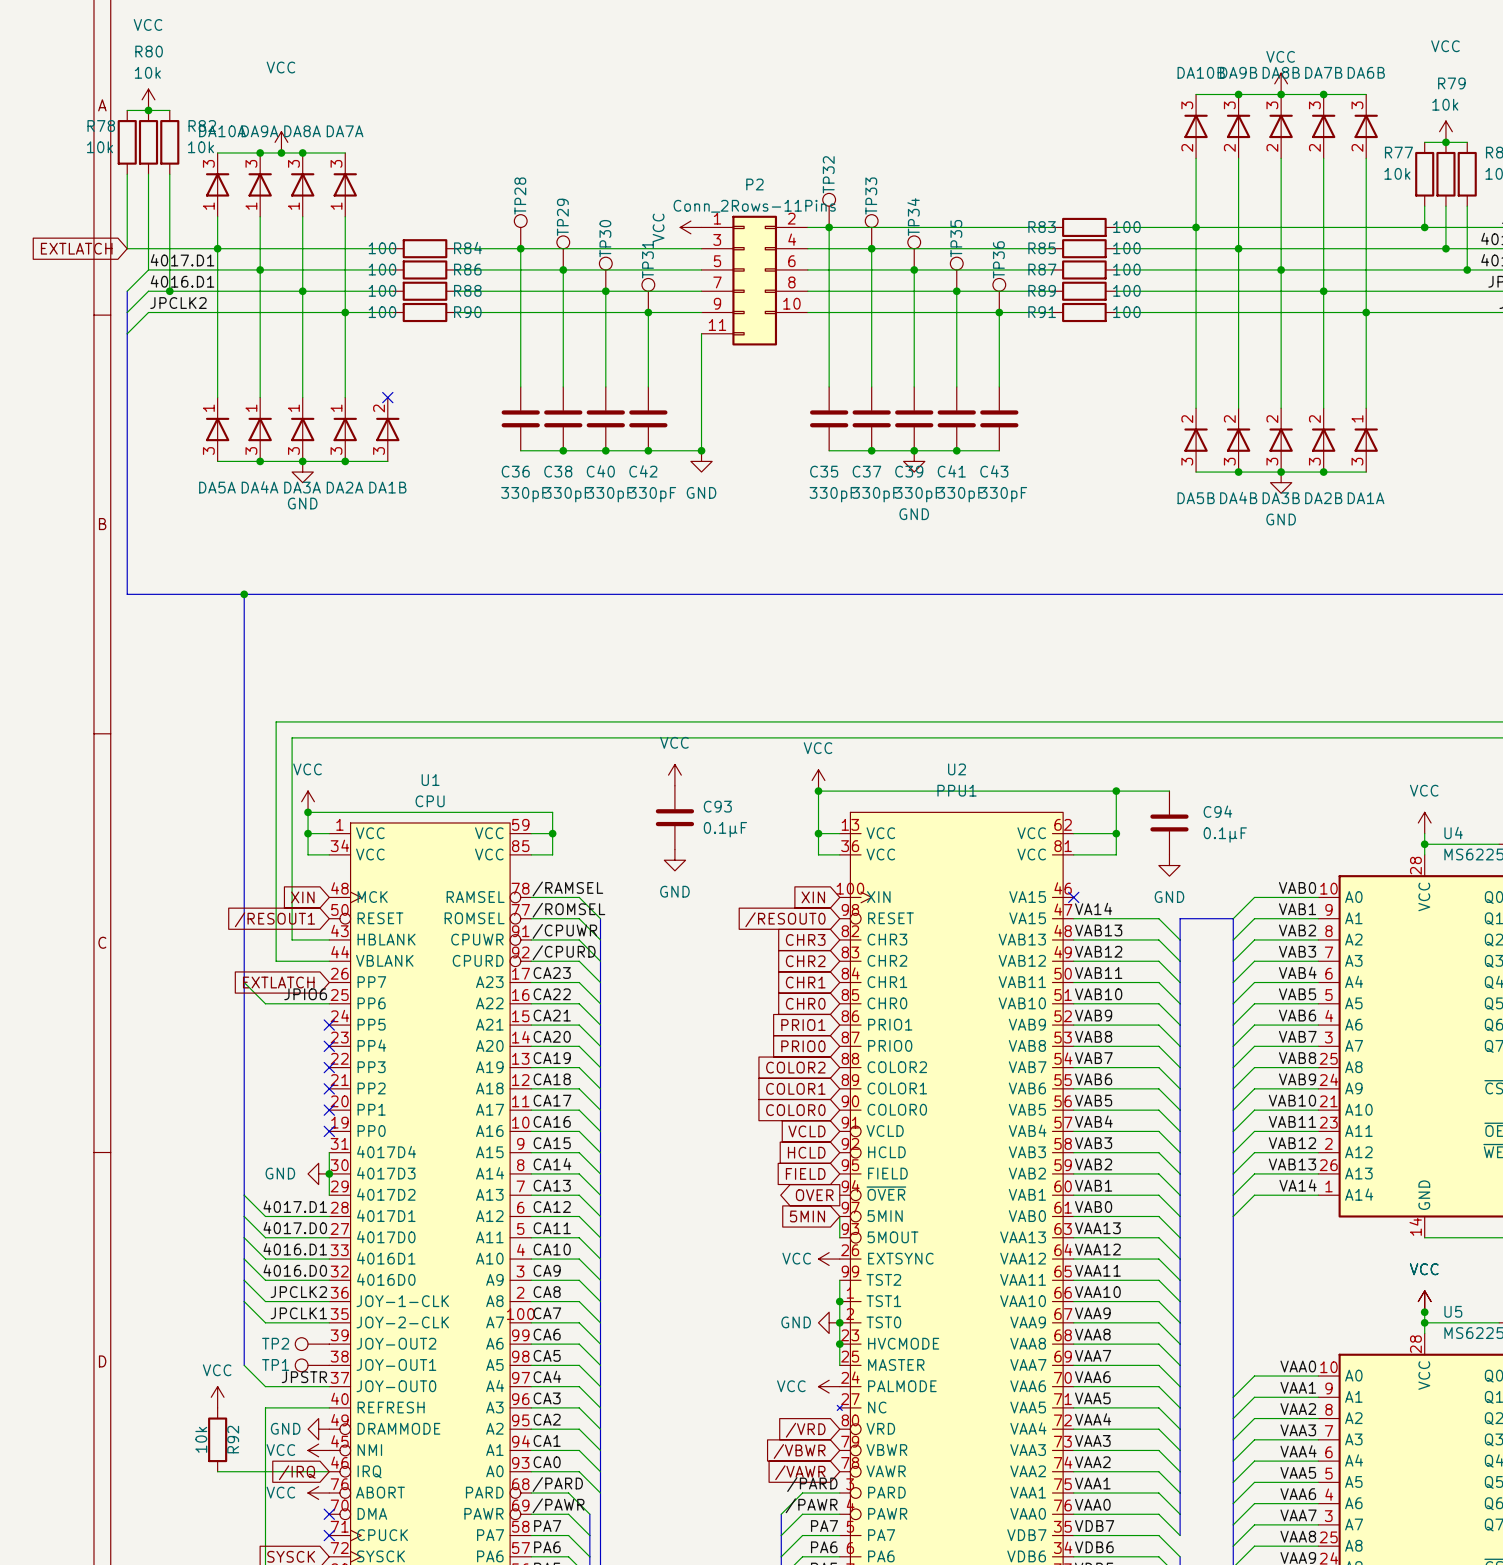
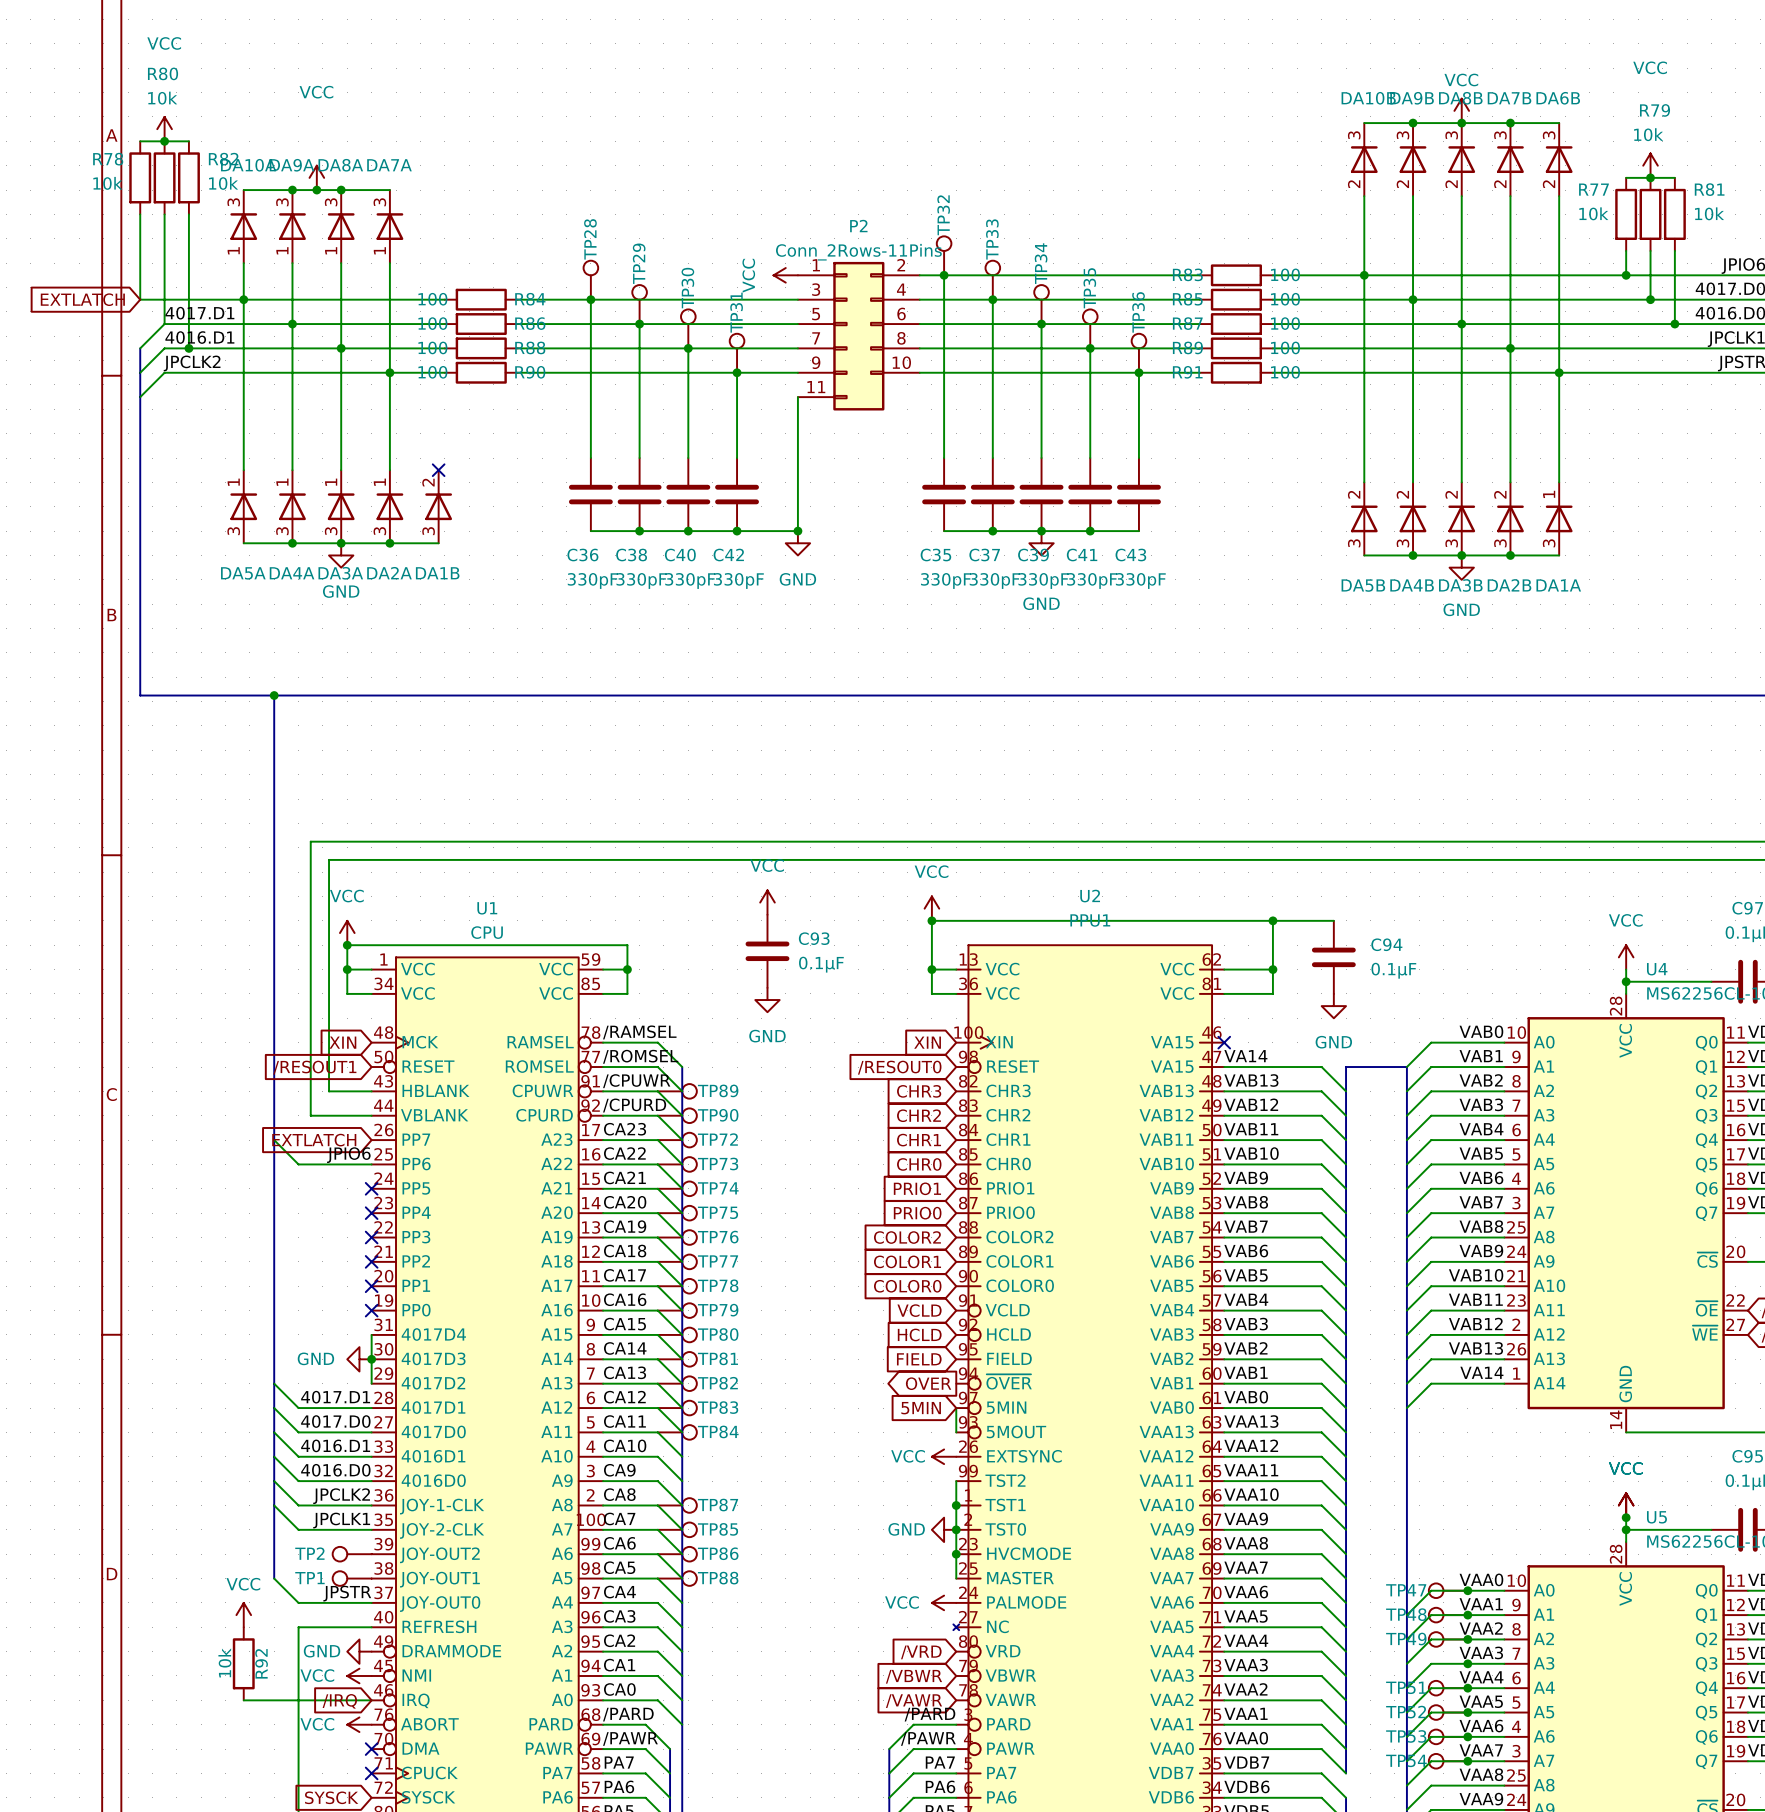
TP89: none -> (677, 1091)
TP90: none -> (677, 1115)
TP72: none -> (677, 1140)
TP73: none -> (677, 1164)
TP74: none -> (677, 1188)
TP75: none -> (677, 1213)
TP76: none -> (677, 1237)
TP77: none -> (677, 1261)
TP78: none -> (677, 1286)
TP79: none -> (677, 1310)
TP80: none -> (677, 1334)
TP81: none -> (677, 1359)
TP82: none -> (677, 1383)
TP83: none -> (677, 1408)
TP84: none -> (677, 1432)
TP87: none -> (677, 1505)
TP85: none -> (677, 1529)
TP86: none -> (677, 1554)
TP88: none -> (677, 1578)
TP47: none -> (1448, 1590)
junction: none -> (1467, 1590)
TP48: none -> (1448, 1615)
junction: none -> (1467, 1615)
TP49: none -> (1448, 1639)
junction: none -> (1467, 1639)
junction: none -> (1467, 1663)
TP51: none -> (1448, 1688)
junction: none -> (1467, 1688)
TP52: none -> (1448, 1712)
junction: none -> (1467, 1712)
TP53: none -> (1448, 1736)
junction: none -> (1467, 1736)
TP54: none -> (1448, 1761)
junction: none -> (1467, 1761)

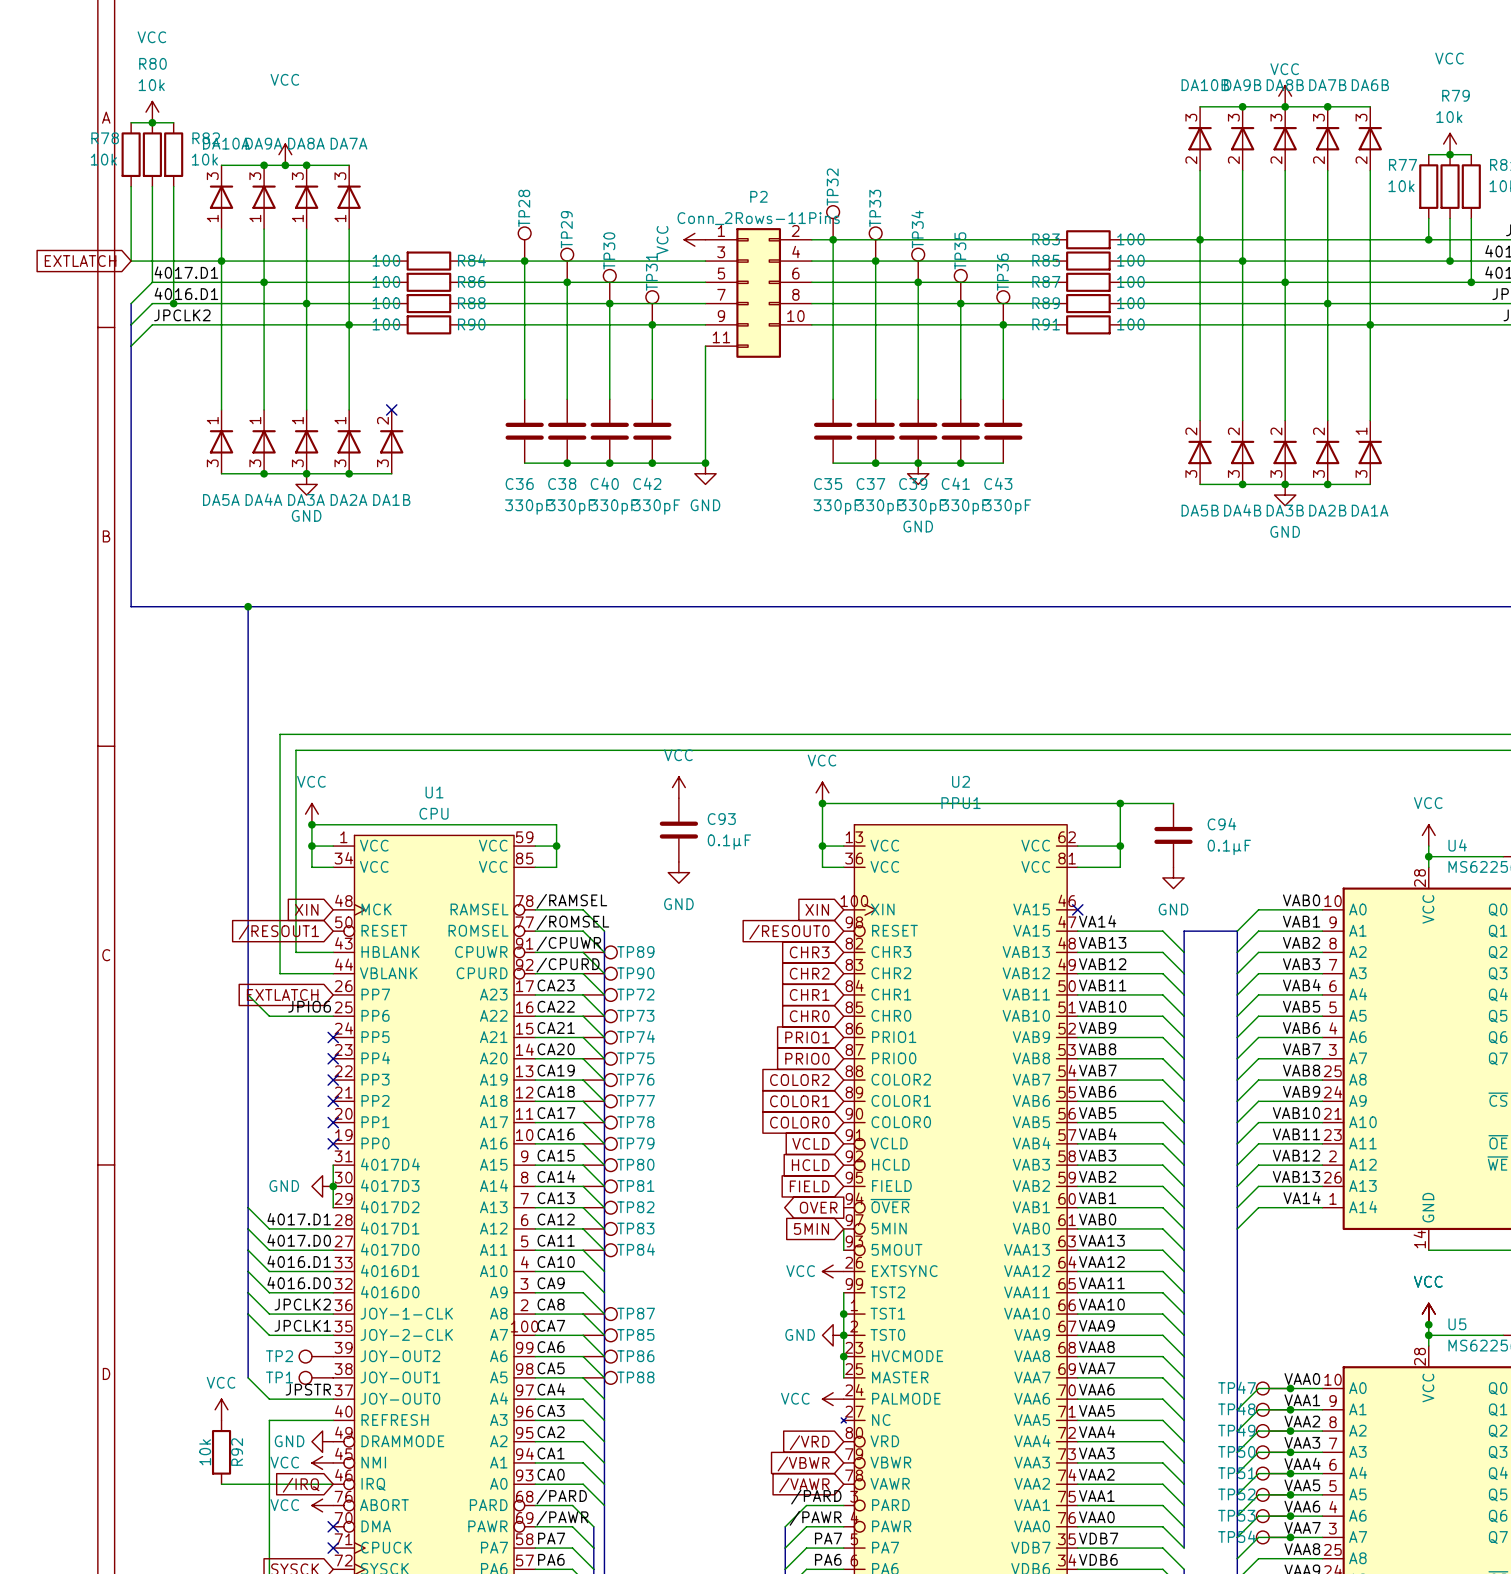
TP50: none -> (1273, 1452)

